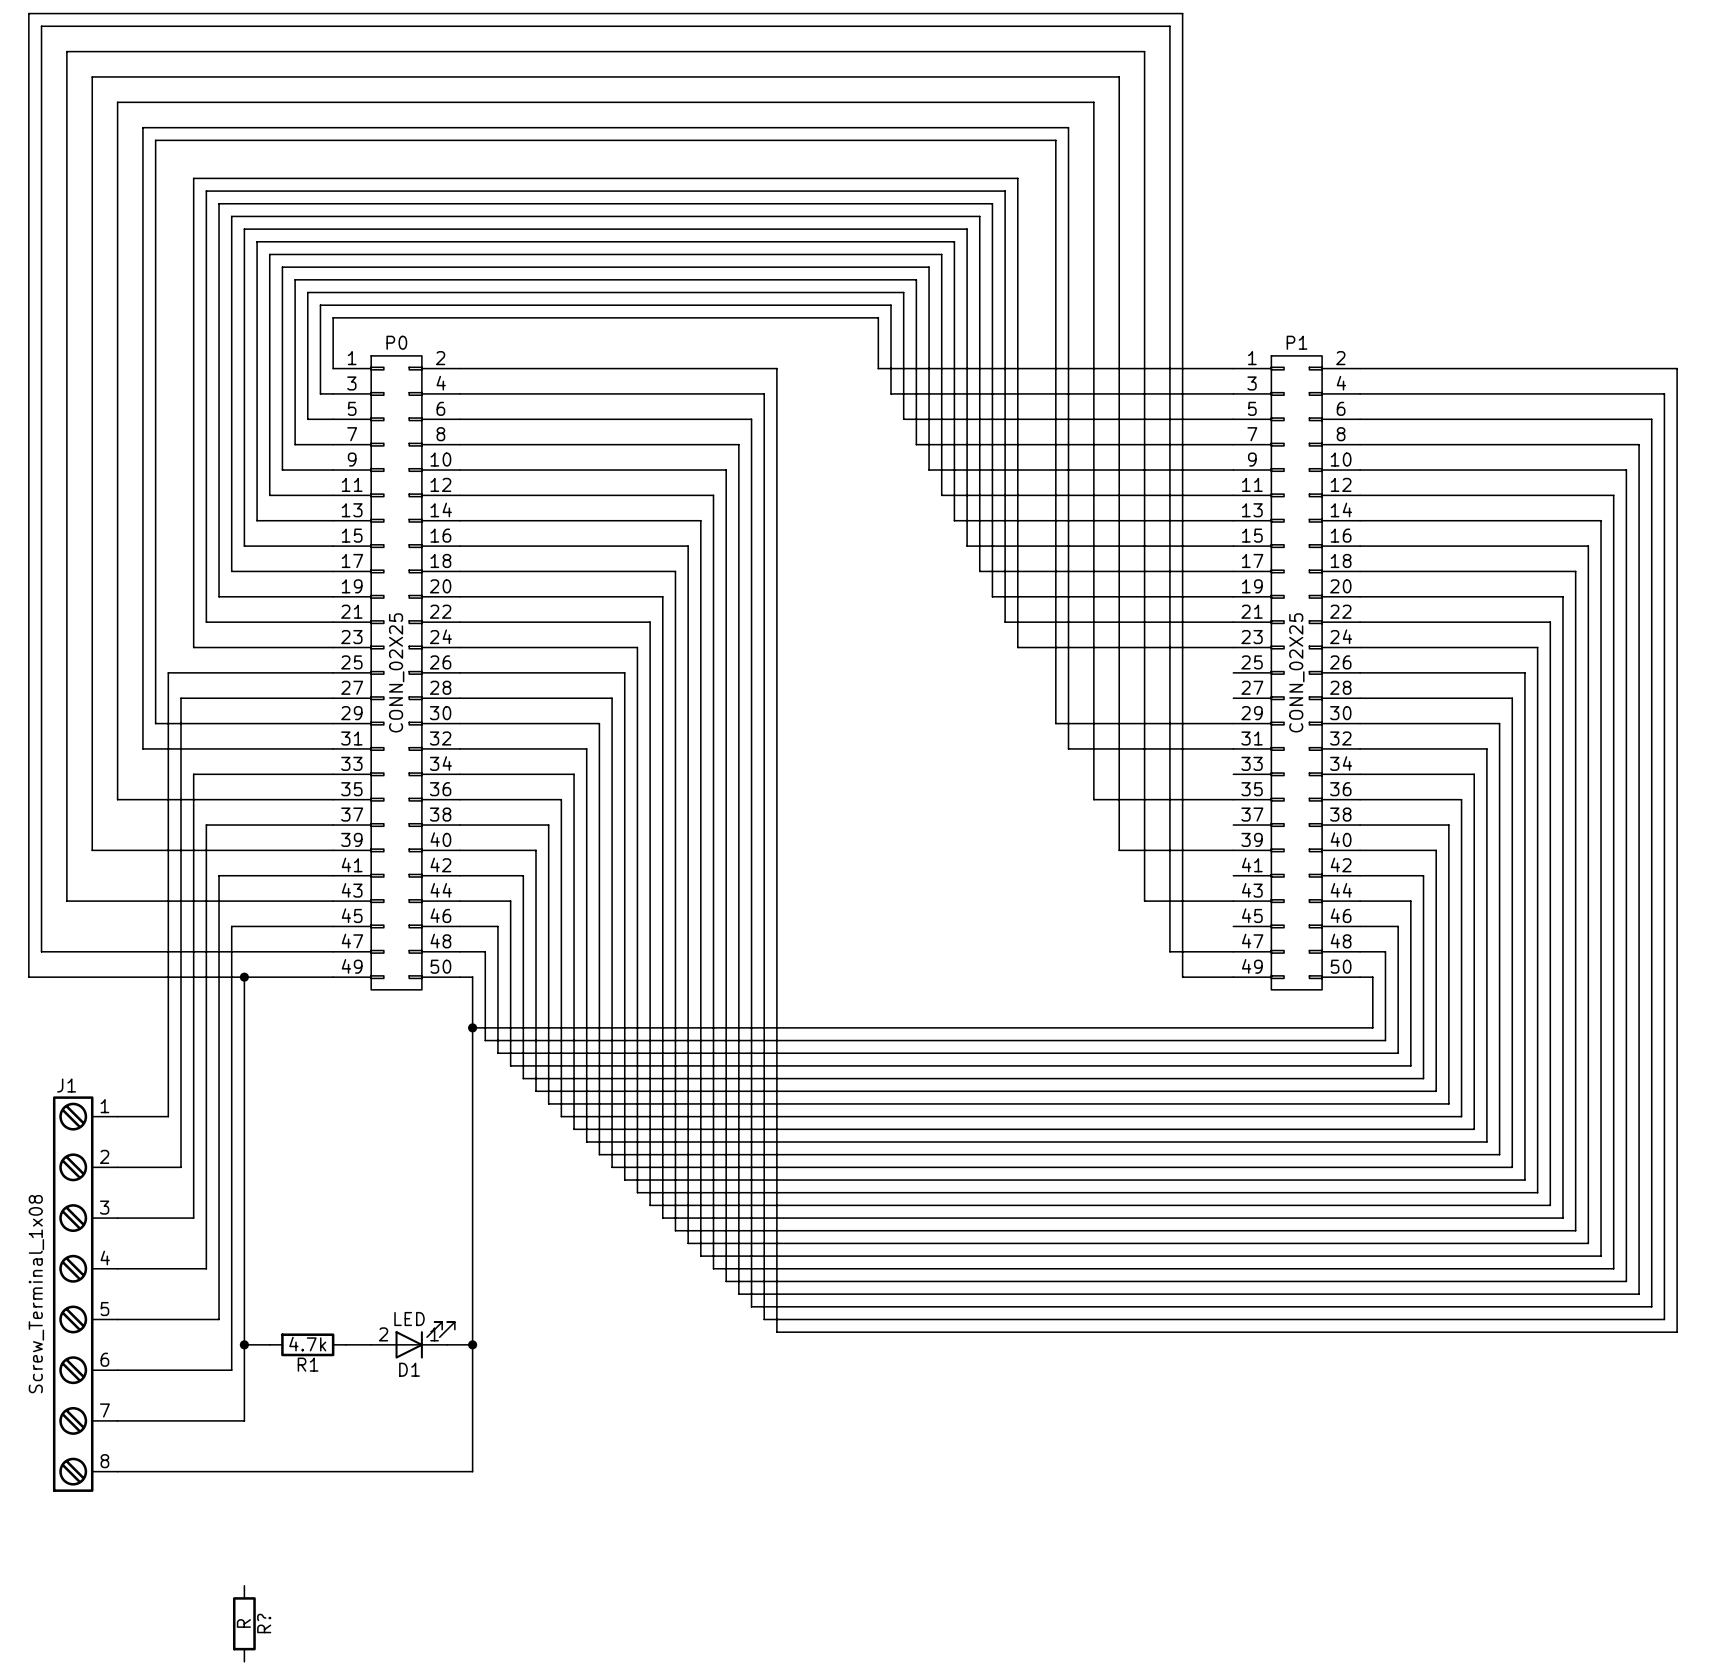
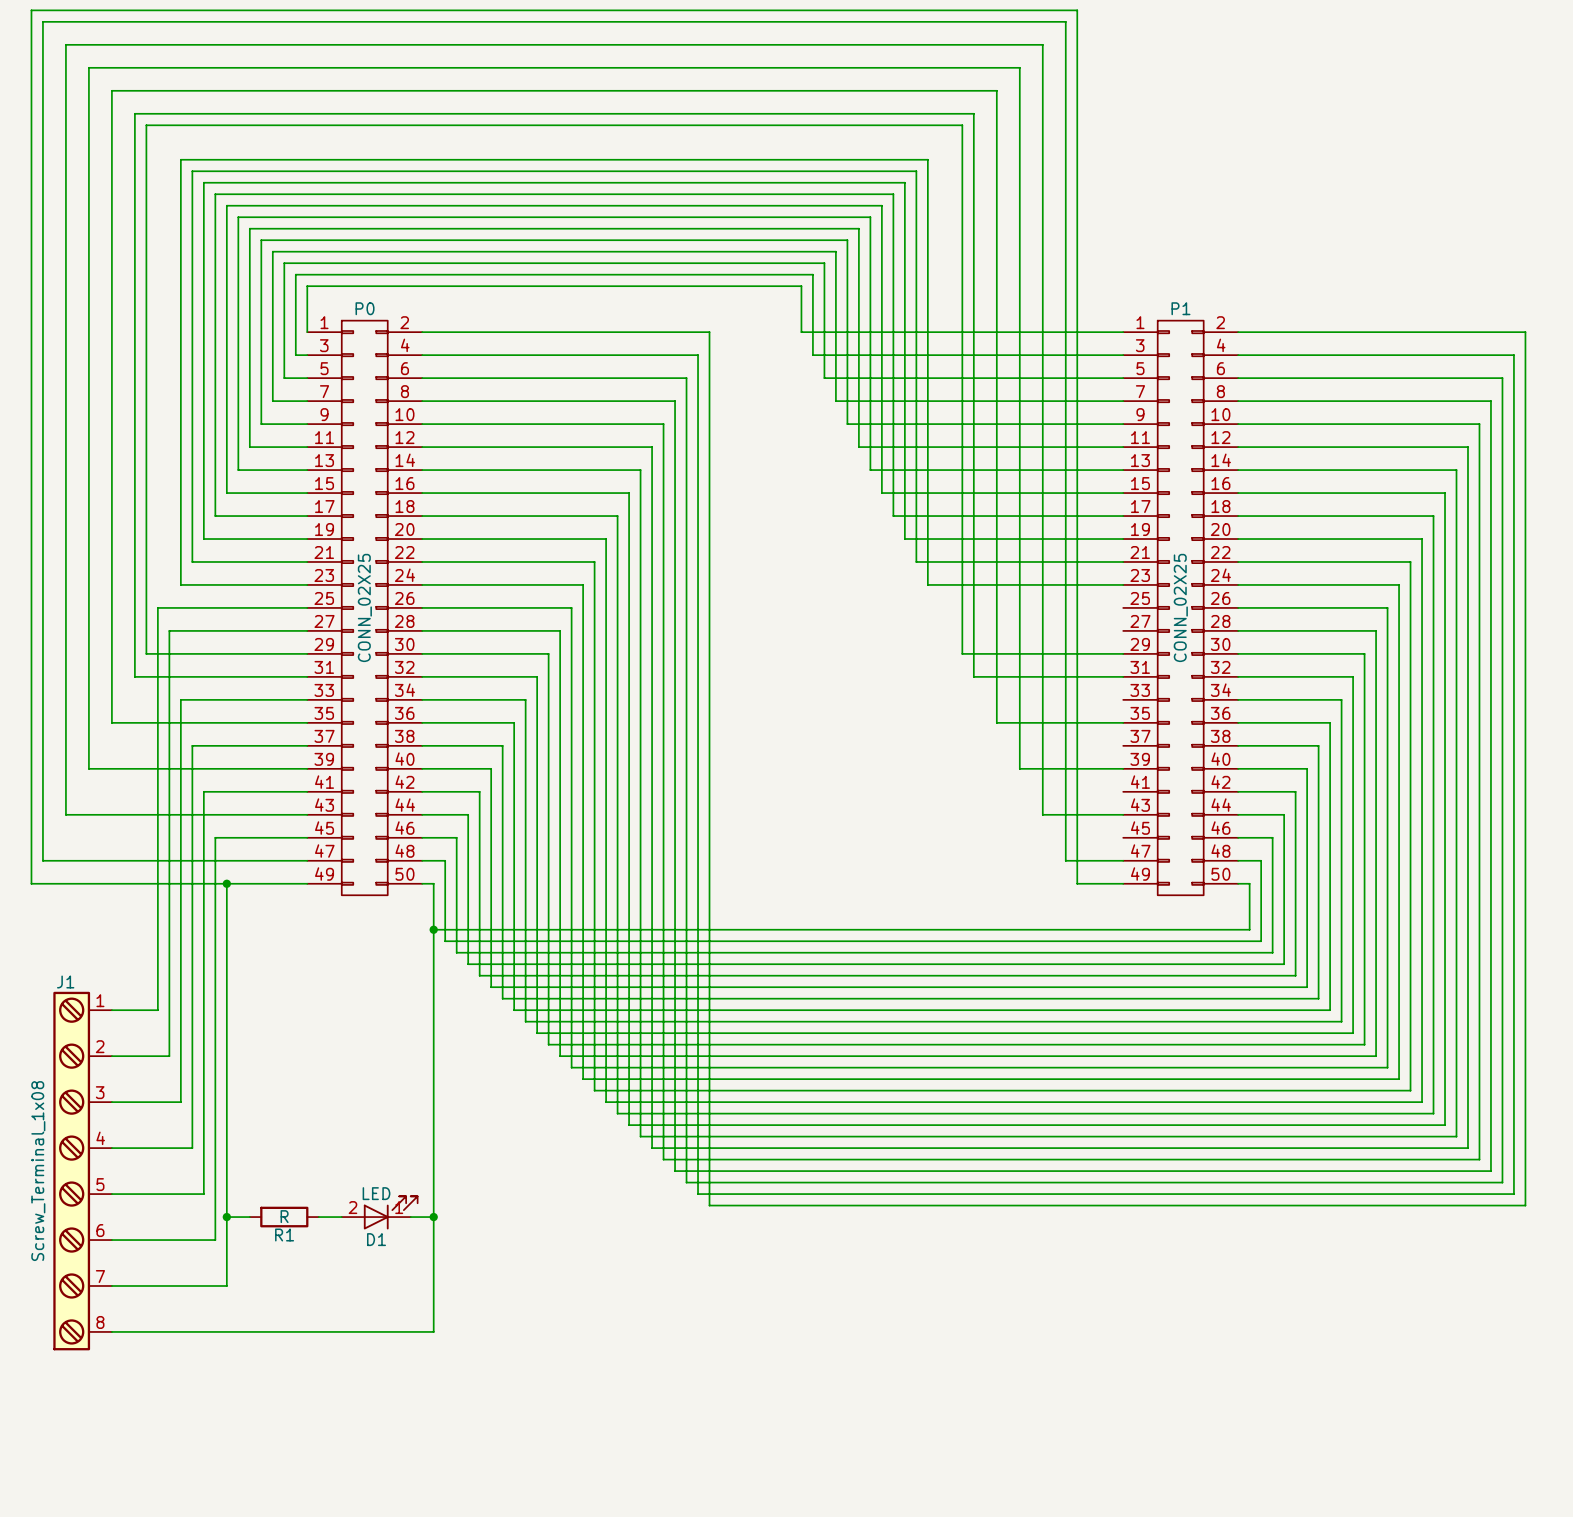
R1 value: 4.7k (307, 1344) -> R (284, 1216)
R?: R (244, 1623) -> none

